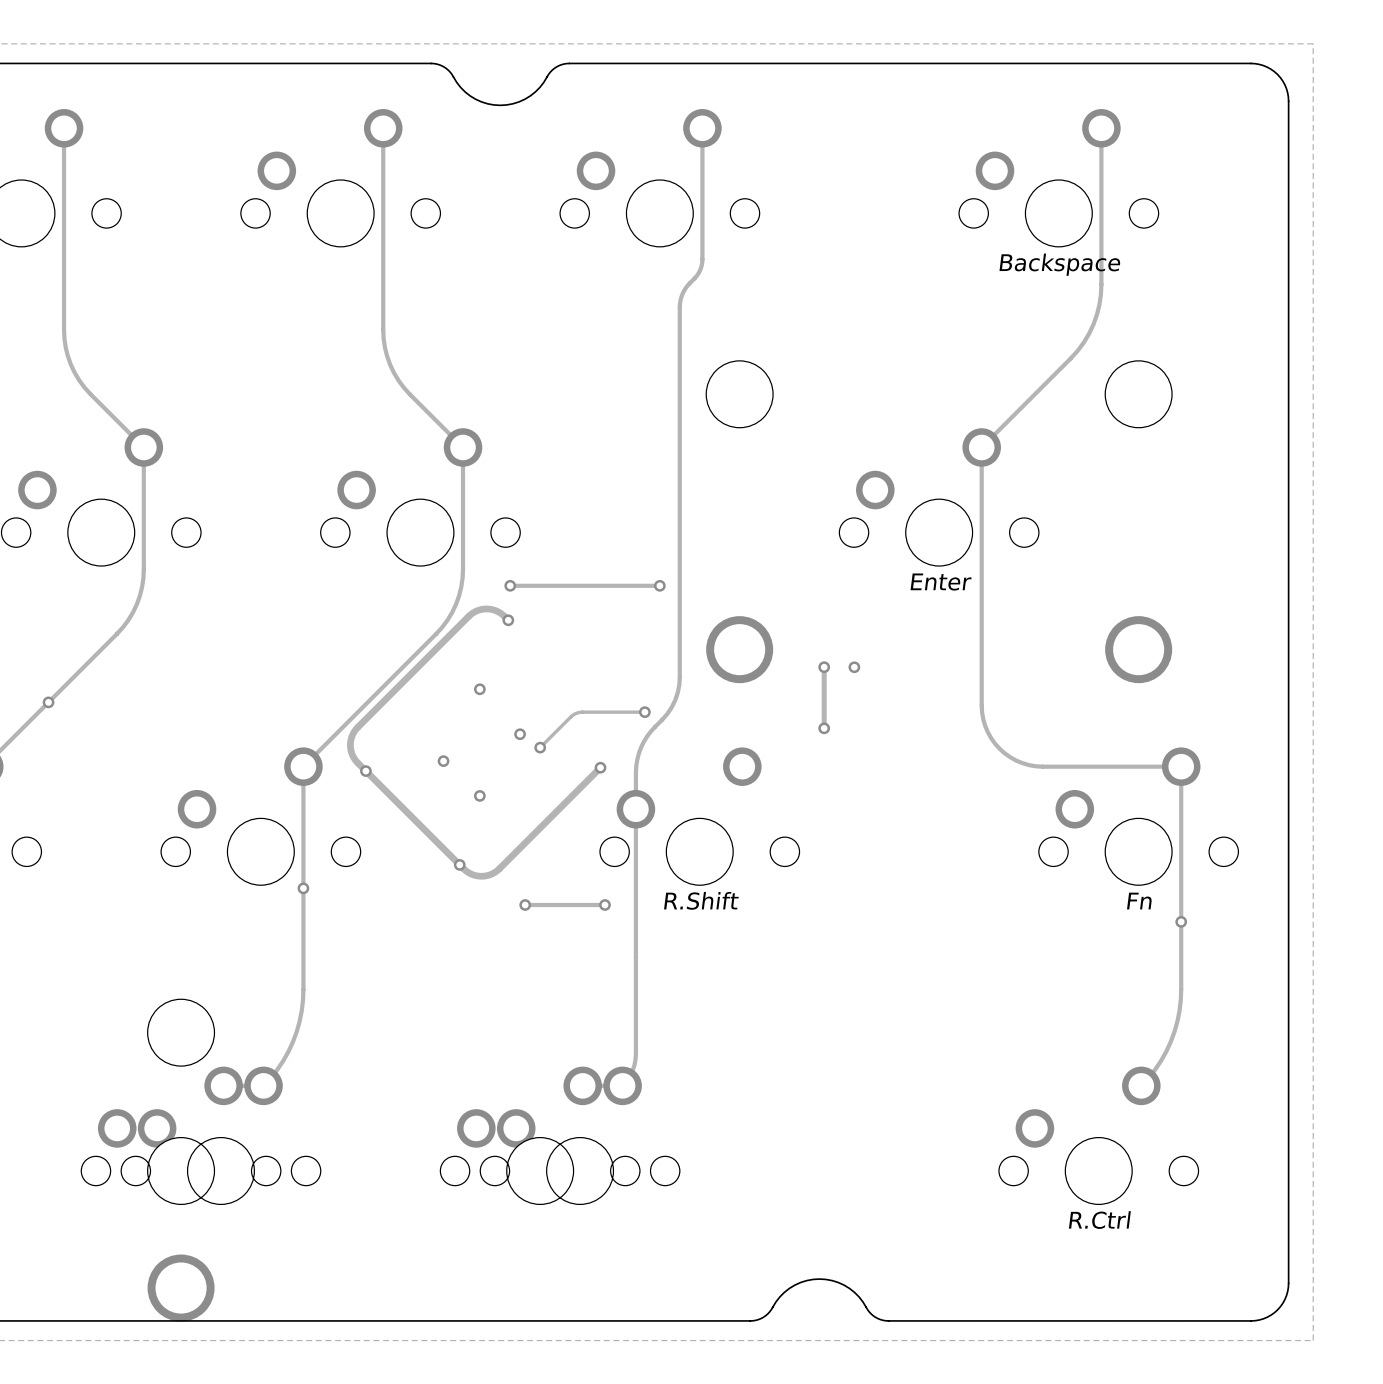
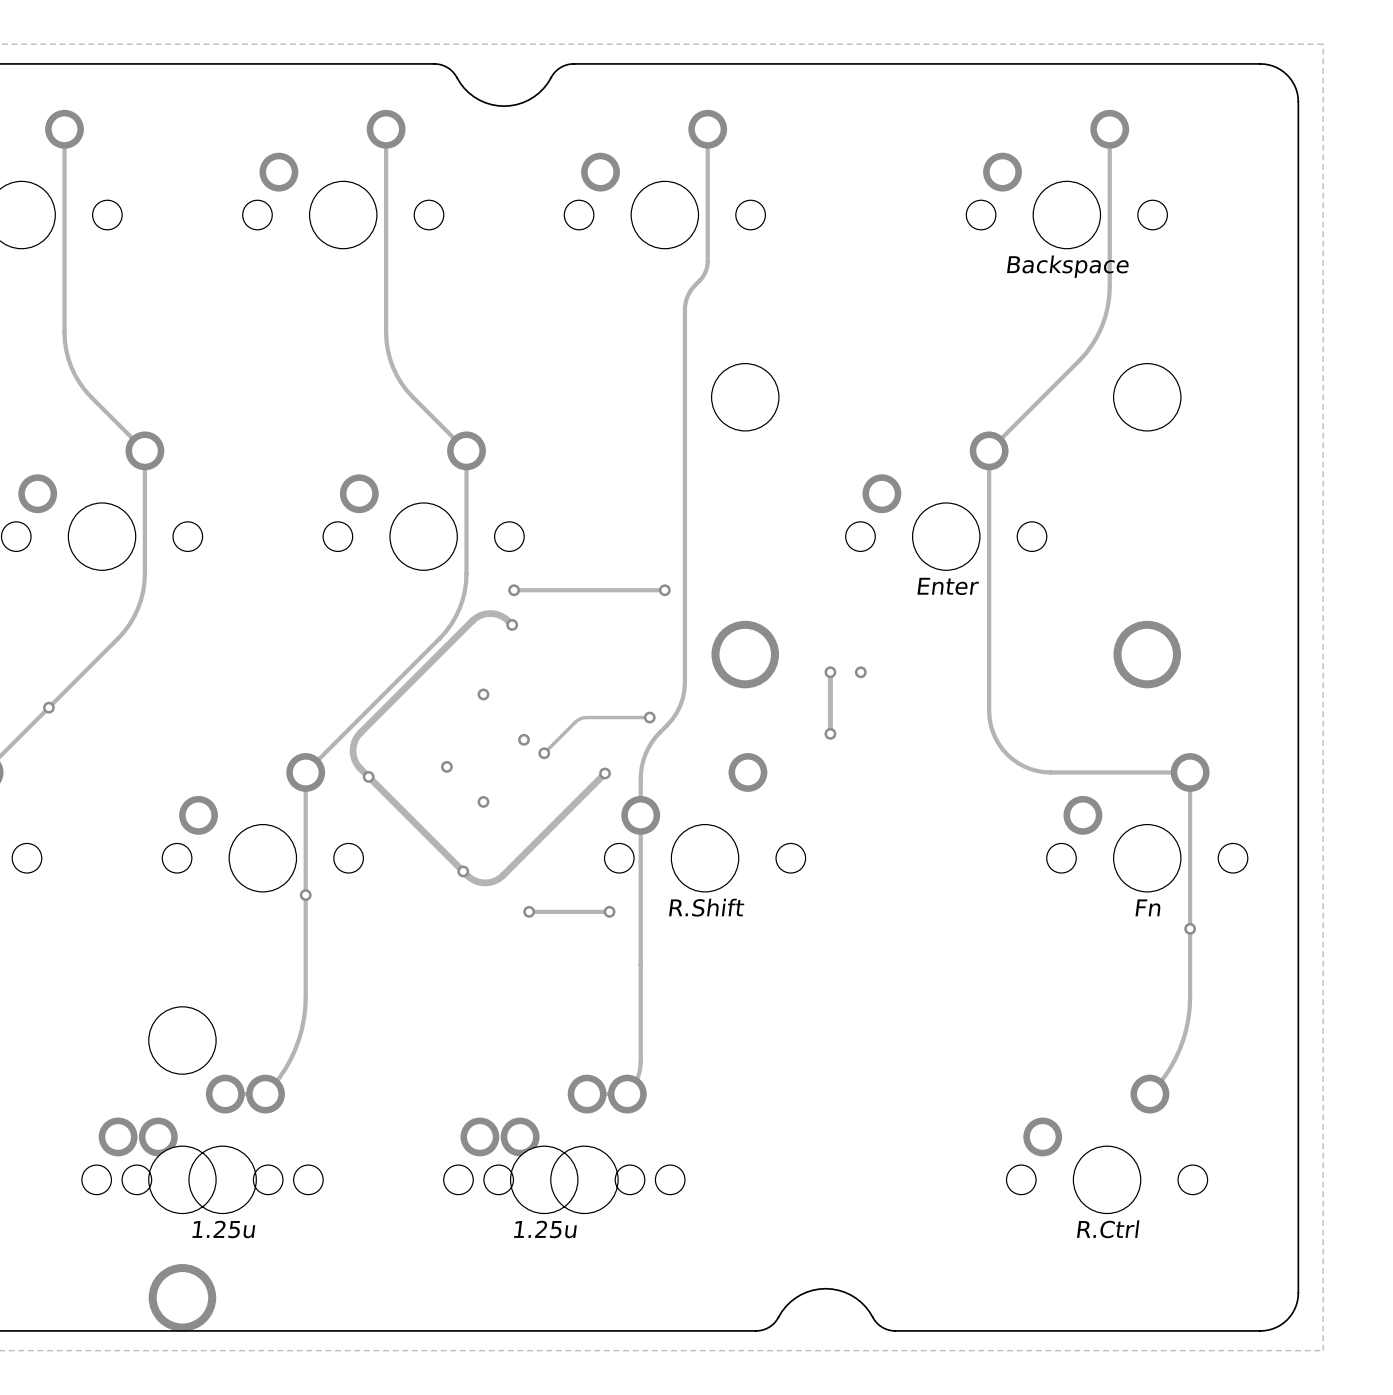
text: none -> 1.25u (223, 1229)
text: none -> 1.25u (545, 1229)

